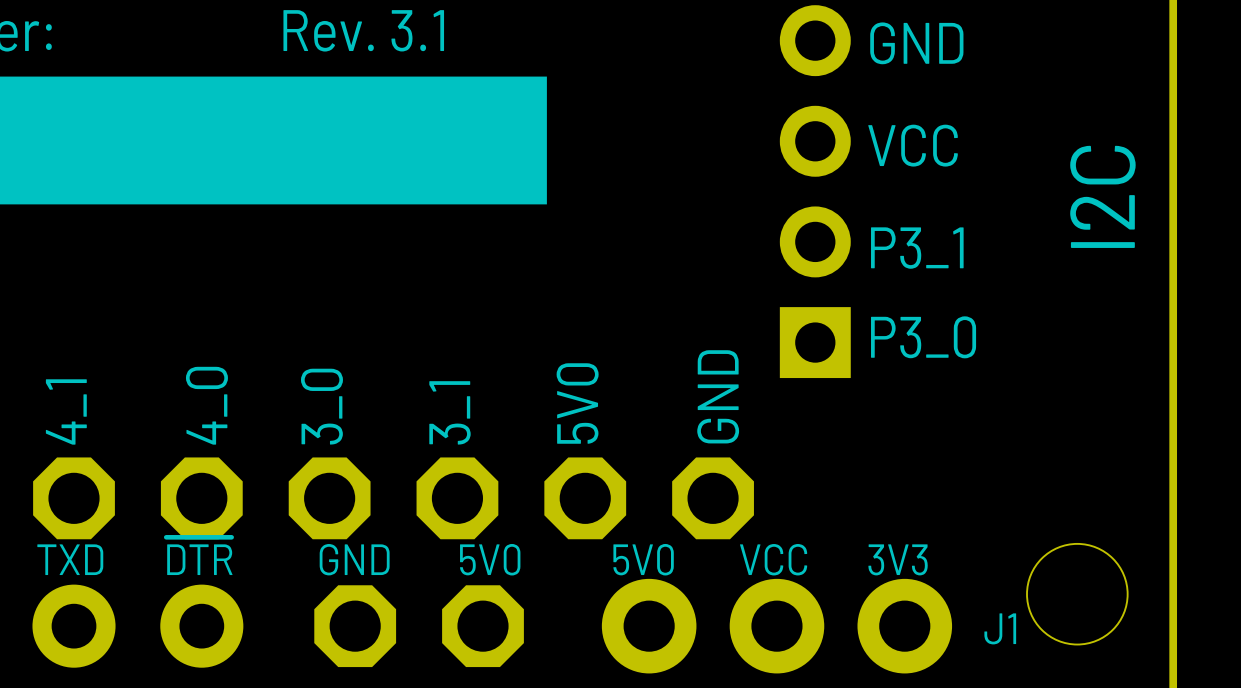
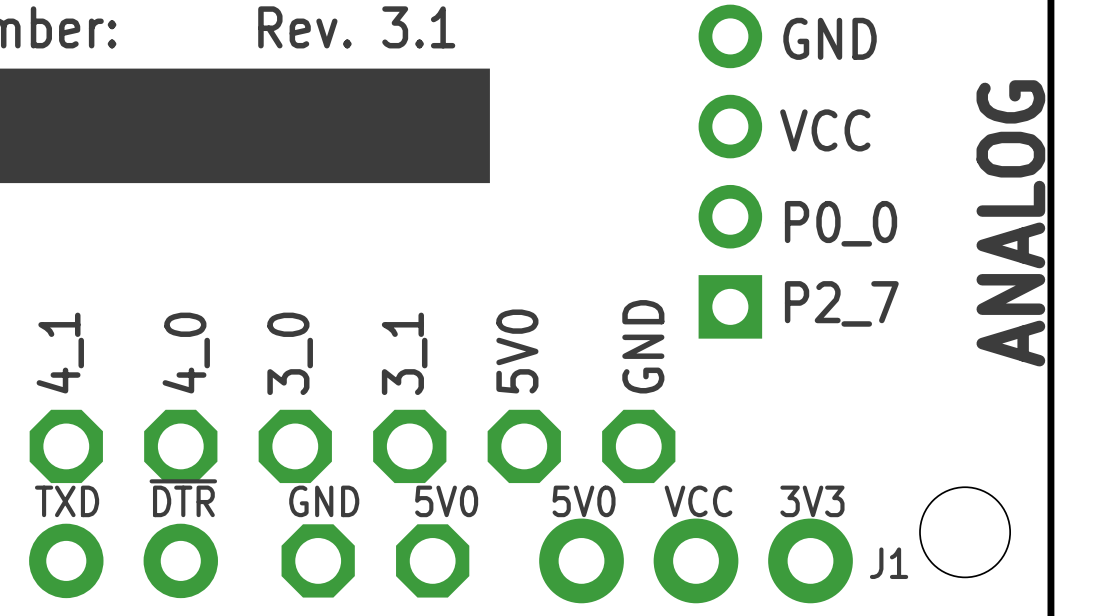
text: I2C (1102, 196) -> none
text: none -> ANALOG (1010, 223)
text: P3_1 (917, 248) -> P0_0 (841, 223)
text: P3_0 (923, 337) -> P2_7 (841, 303)

